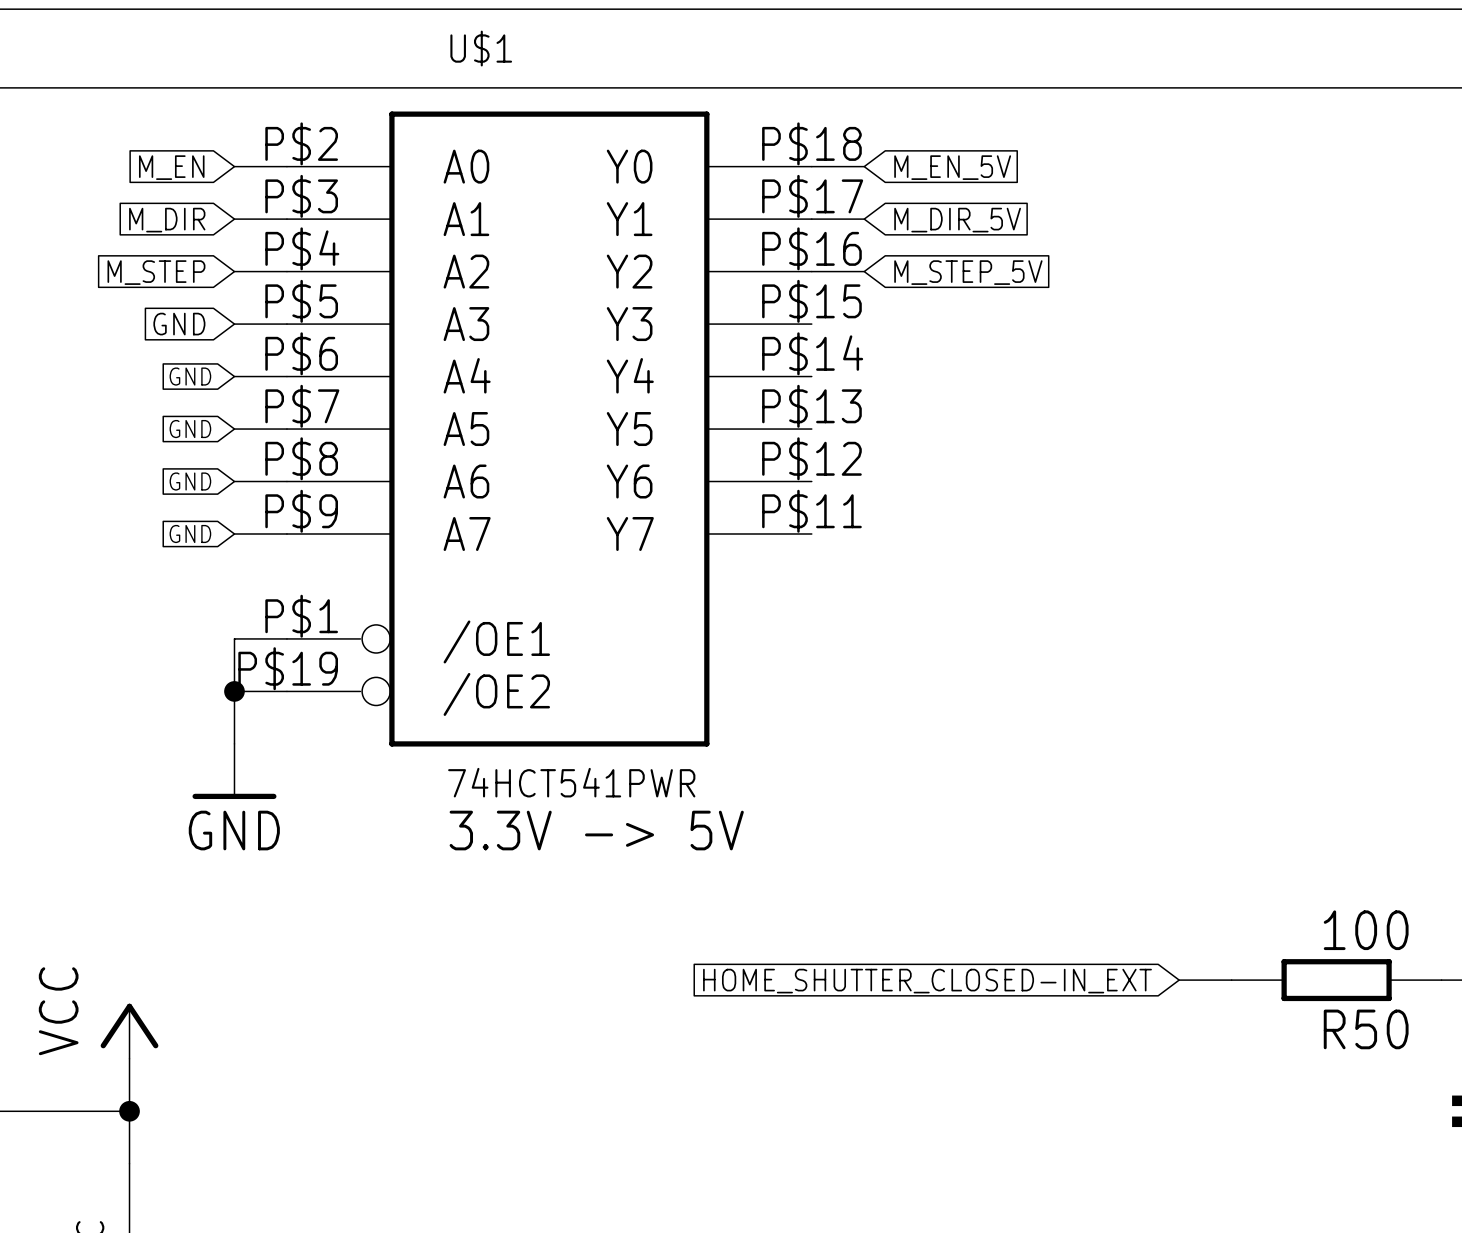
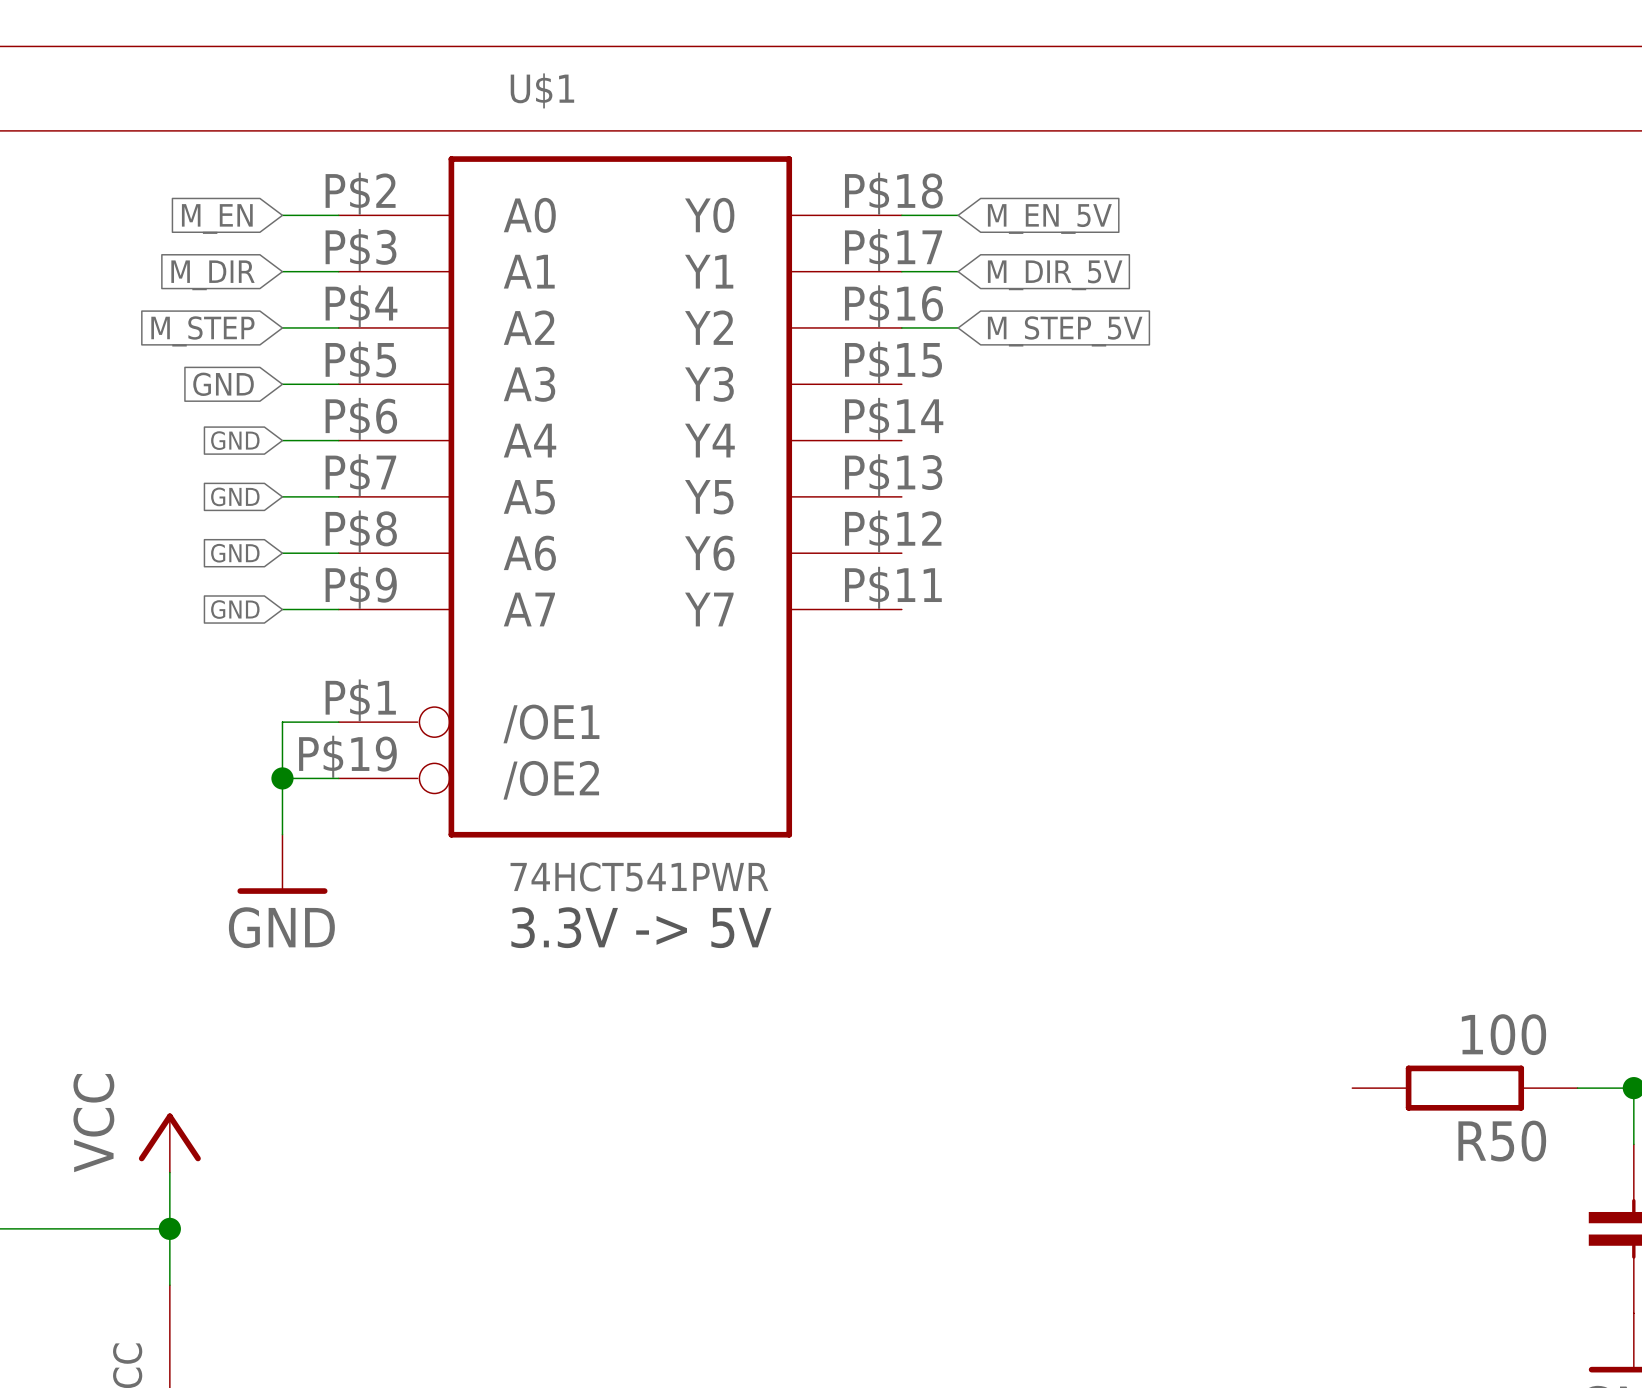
wire: (1179, 980) (1231, 980) -> none
global label: HOME_SHUTTER_CLOSED-IN_EXT (927, 981) -> none

